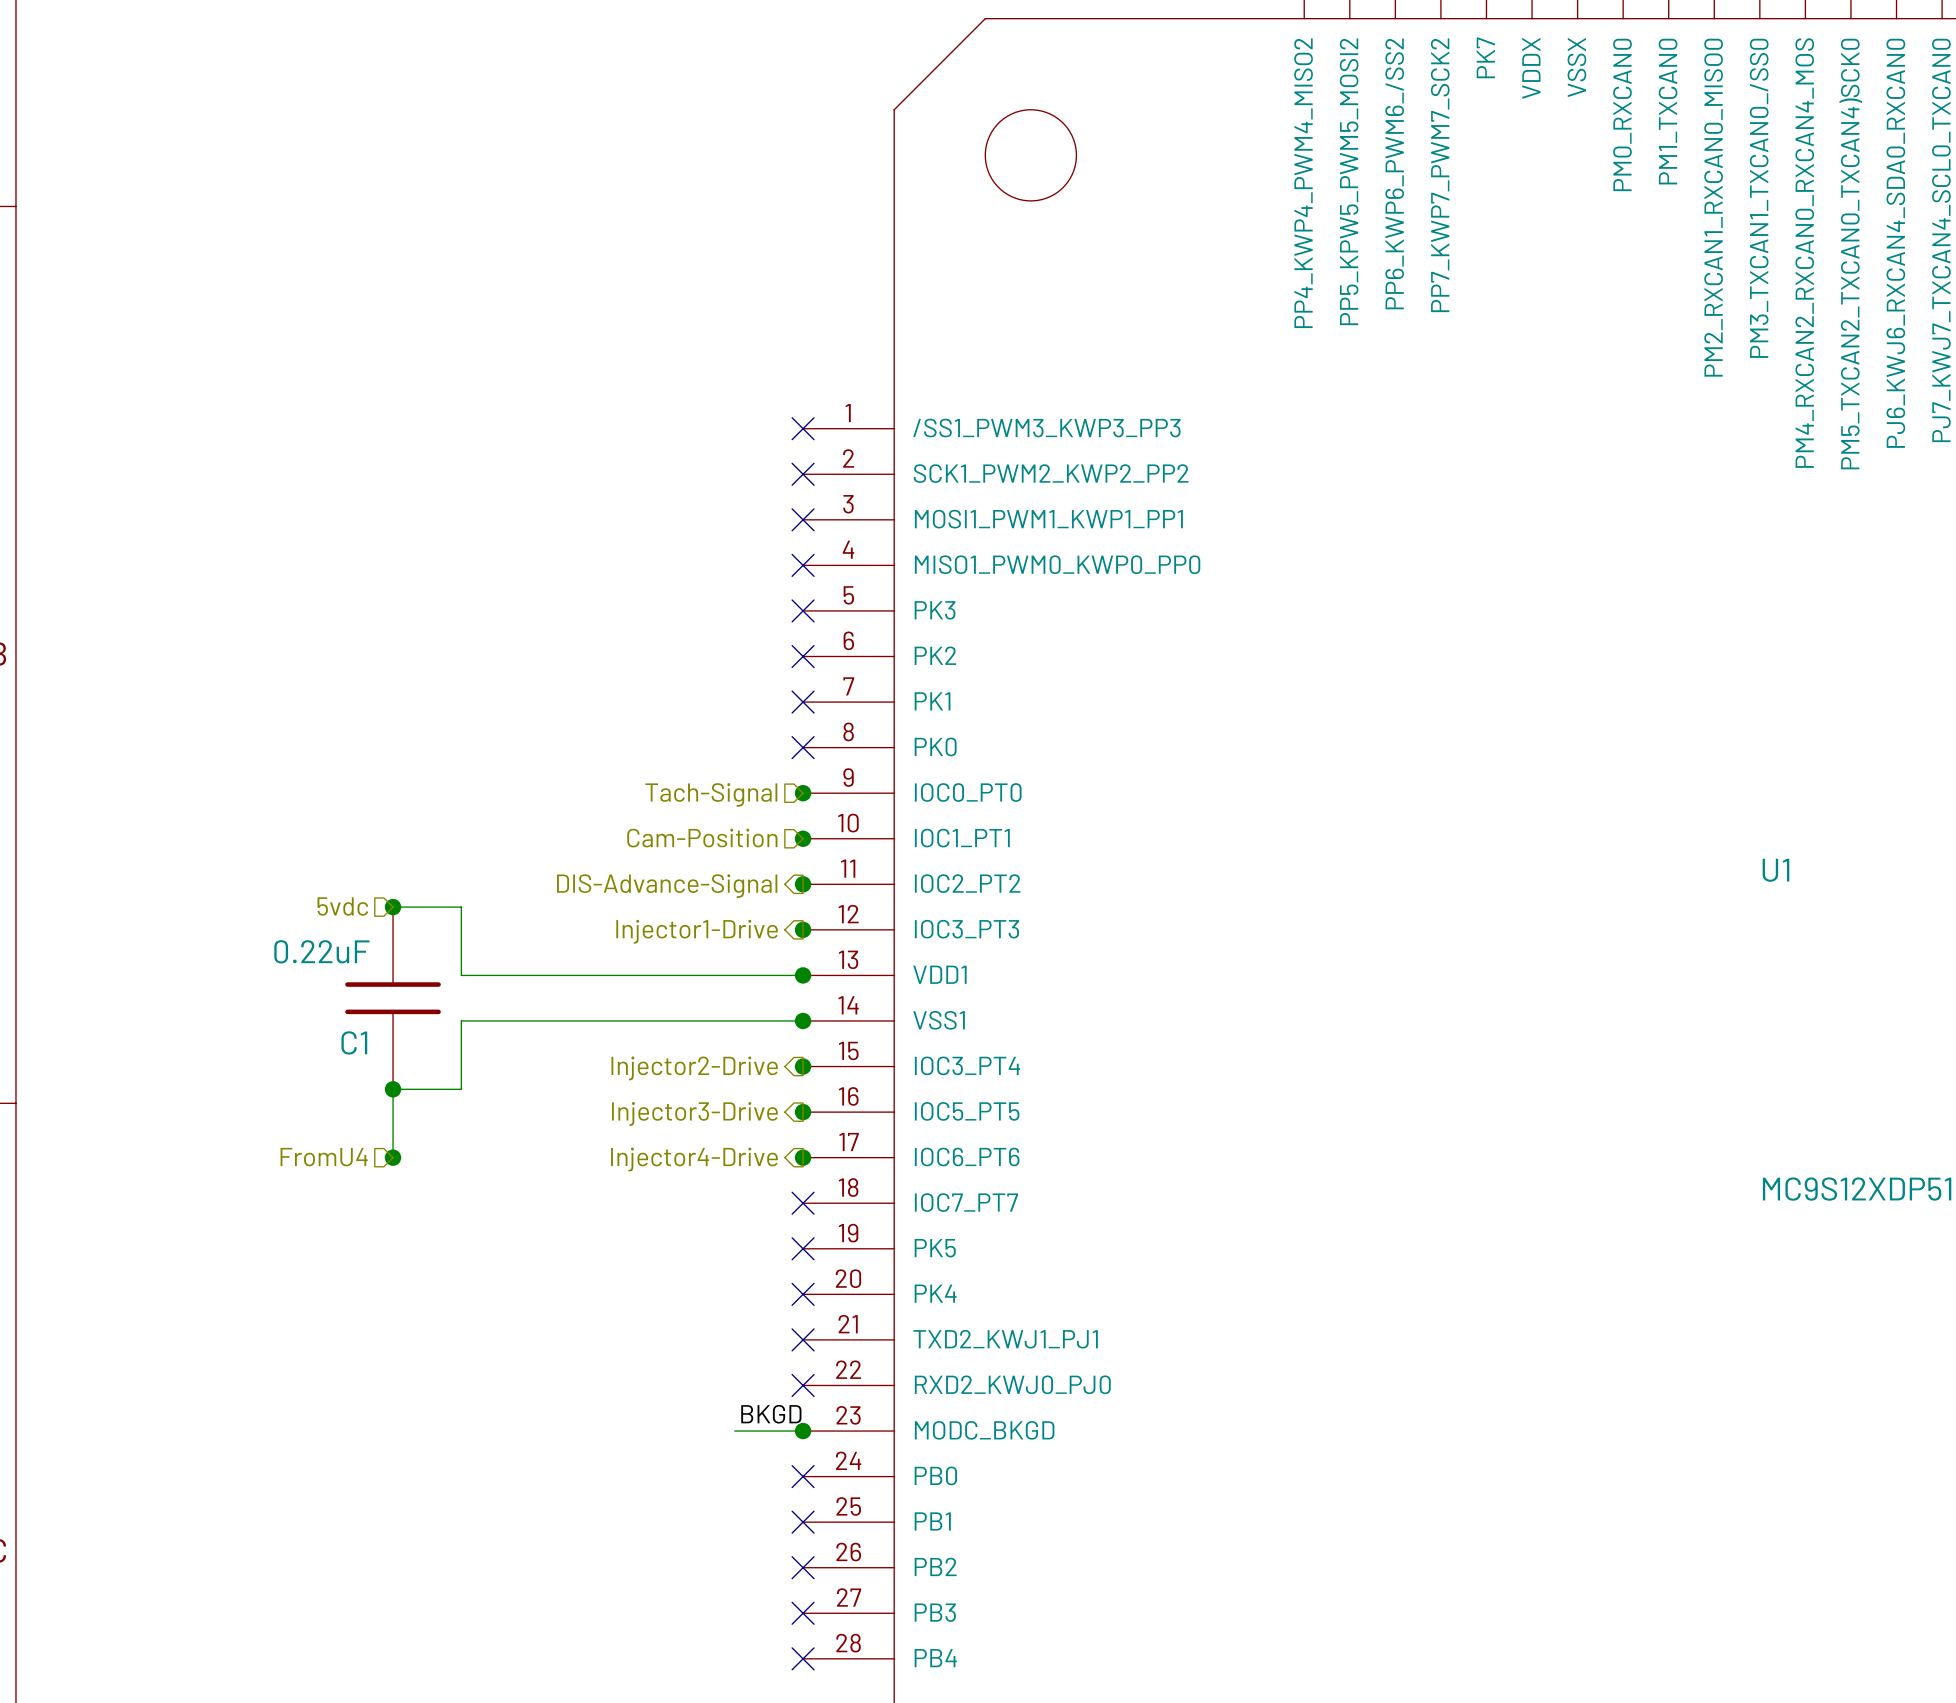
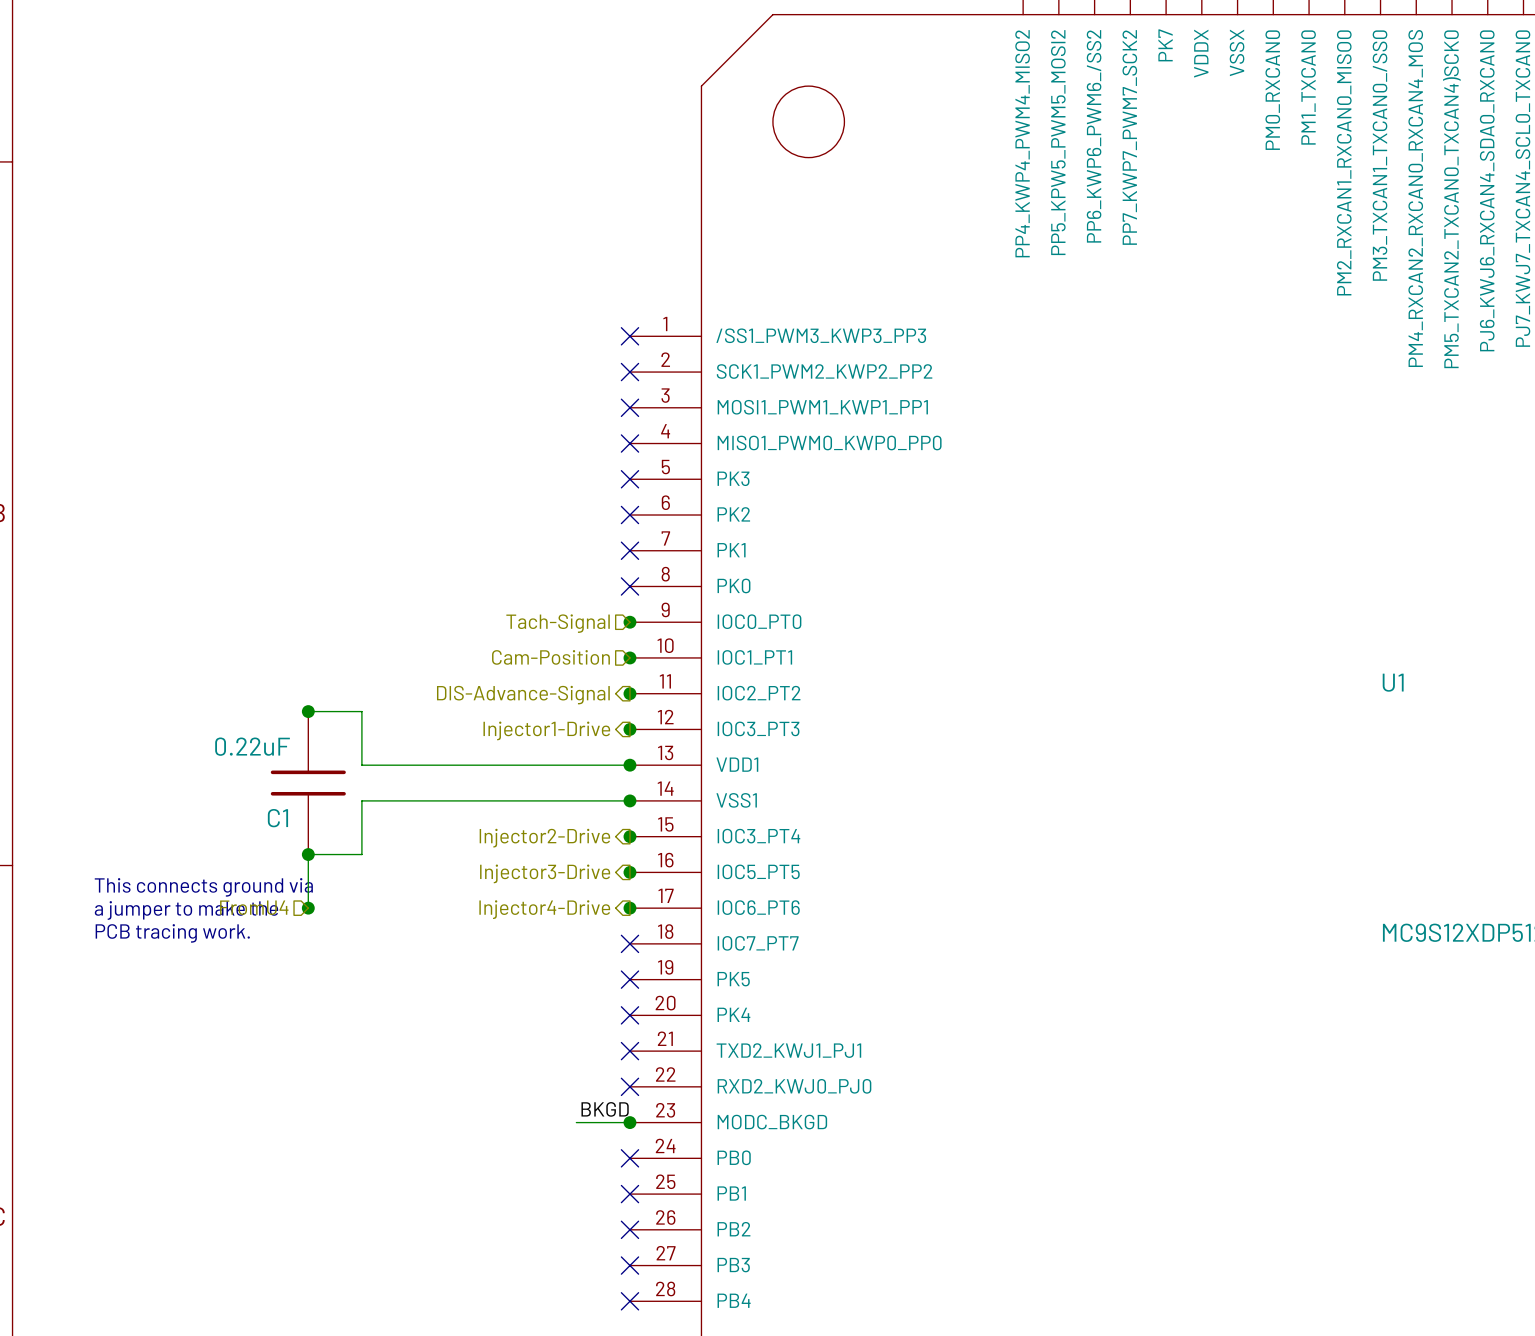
hierarchical label: 5vdc (342, 906) -> none
text: none -> This connects ground via (203, 887)
text: none -> a jumper to make the (186, 910)
text: none -> PCB tracing work. (172, 933)

